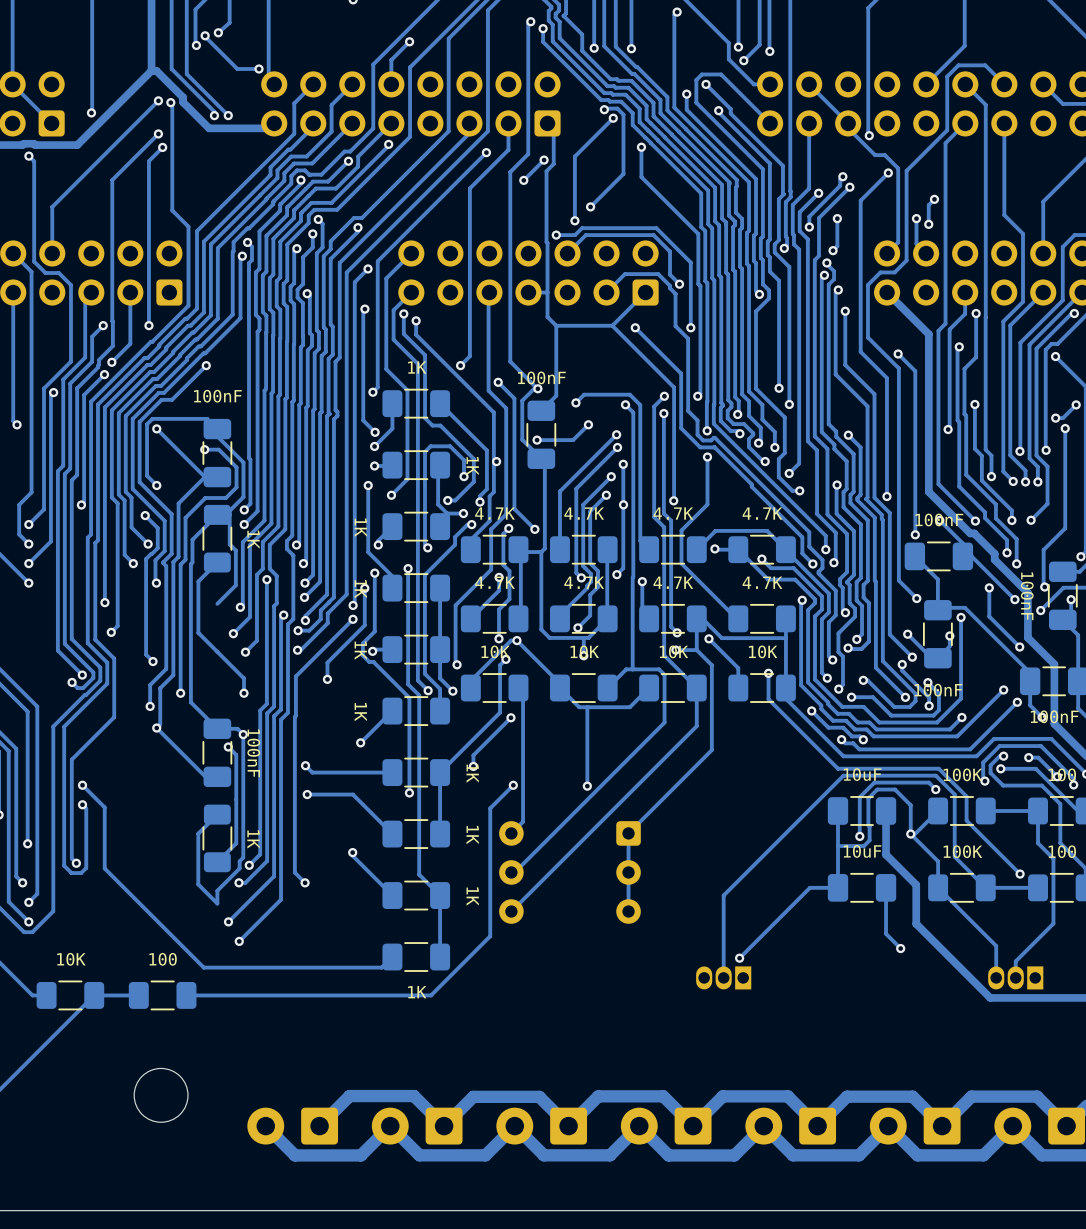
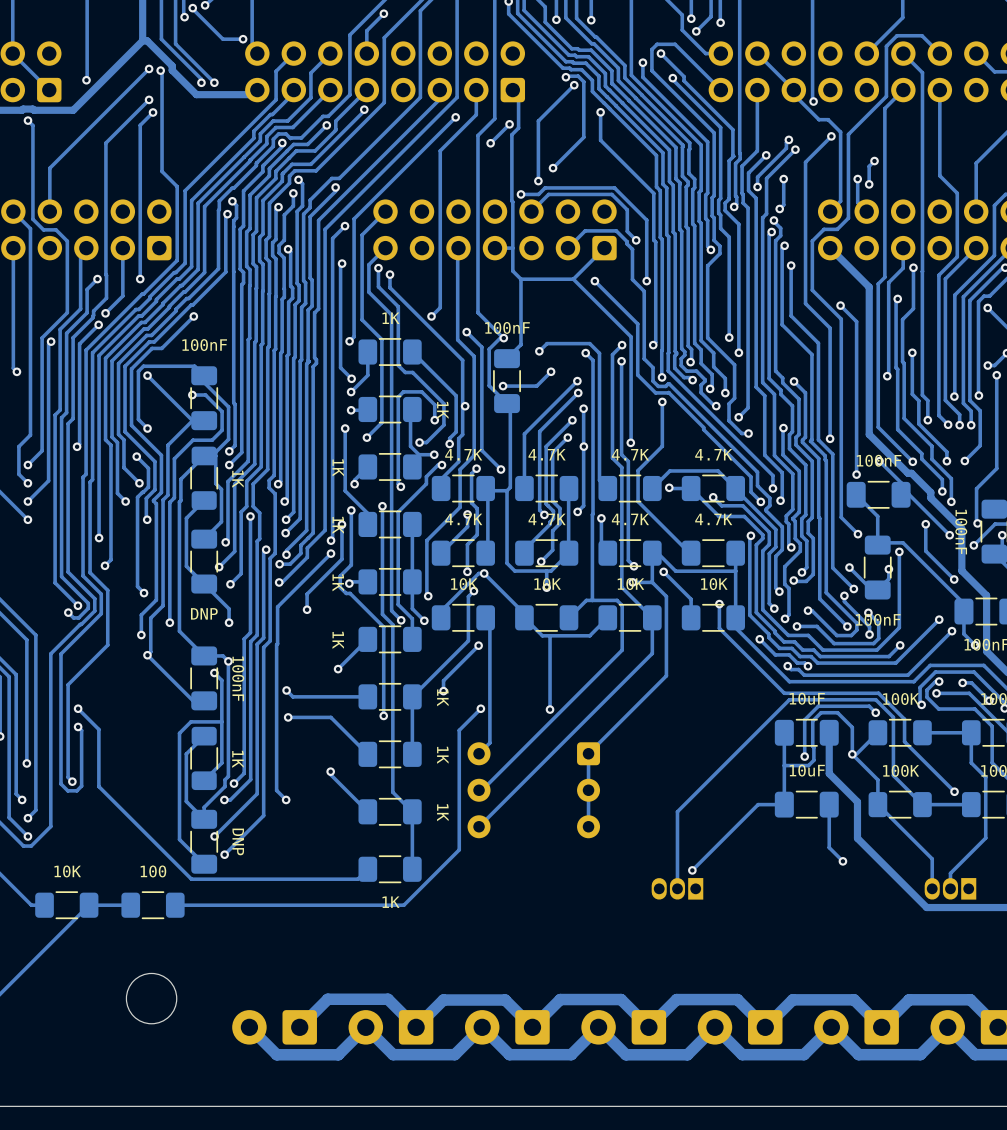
part: none -> (204, 561)
track: none -> (221, 721) (190, 721) (179, 733) (179, 839) (204, 864)
part: none -> (204, 841)

